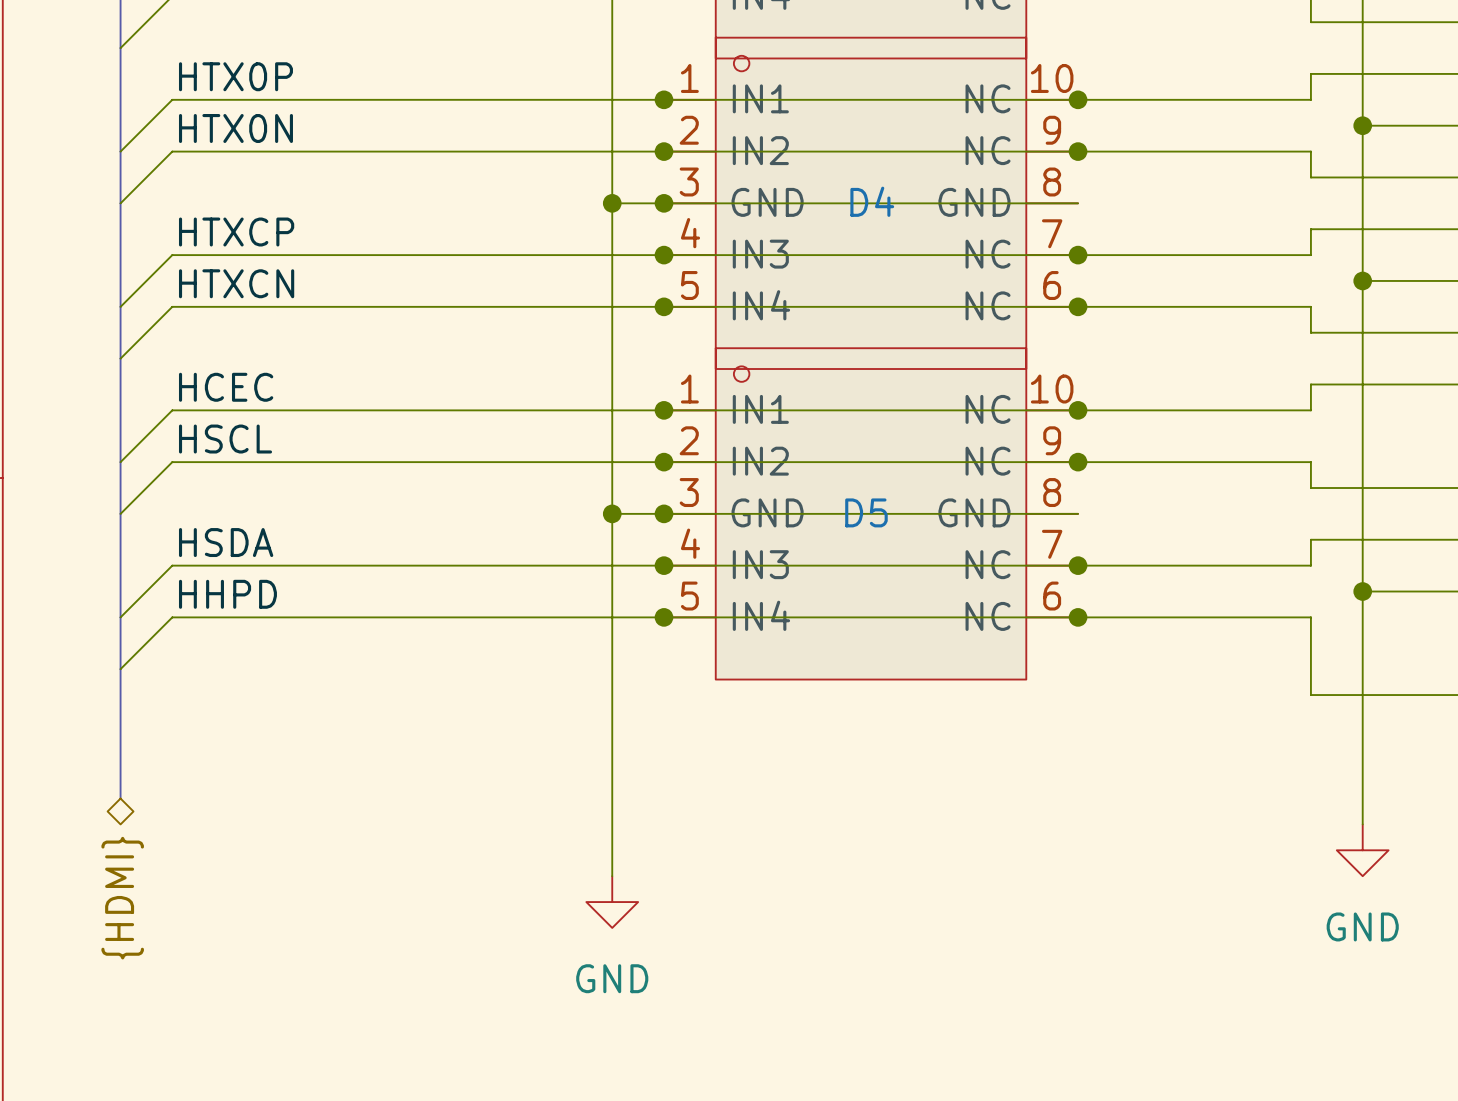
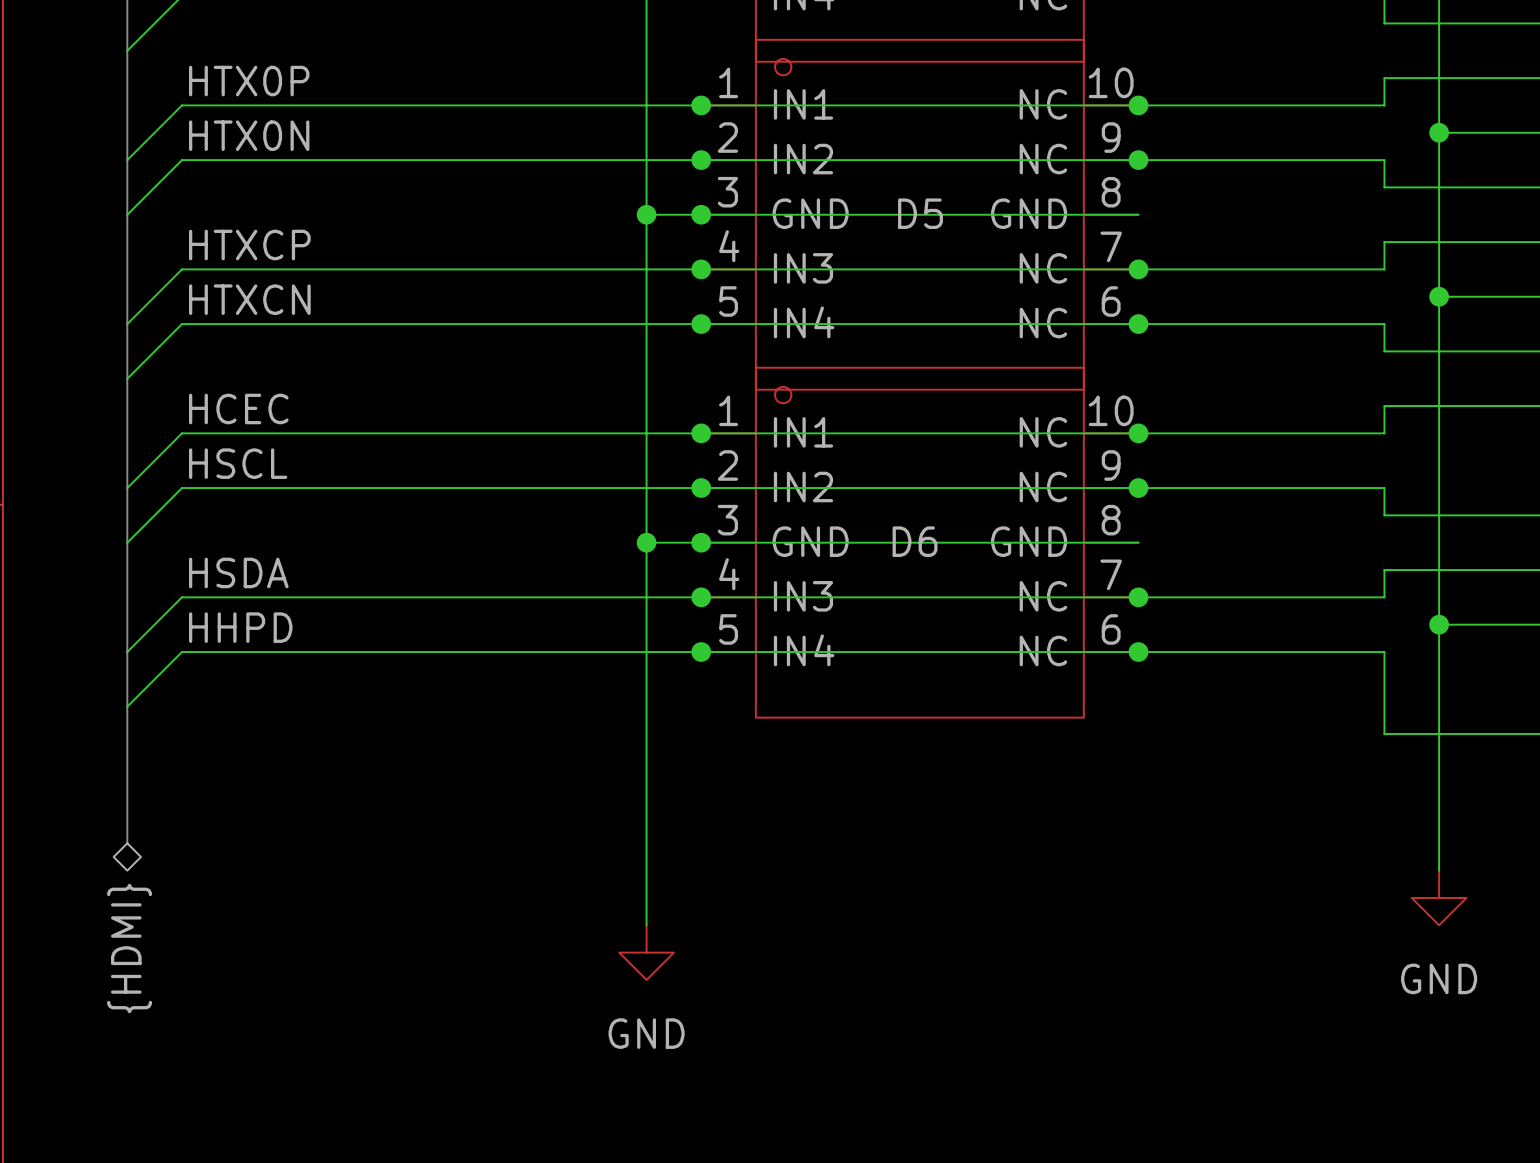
D4 name: D4 (872, 201) -> D5 (920, 213)
D5 name: D5 (866, 512) -> D6 (915, 541)

